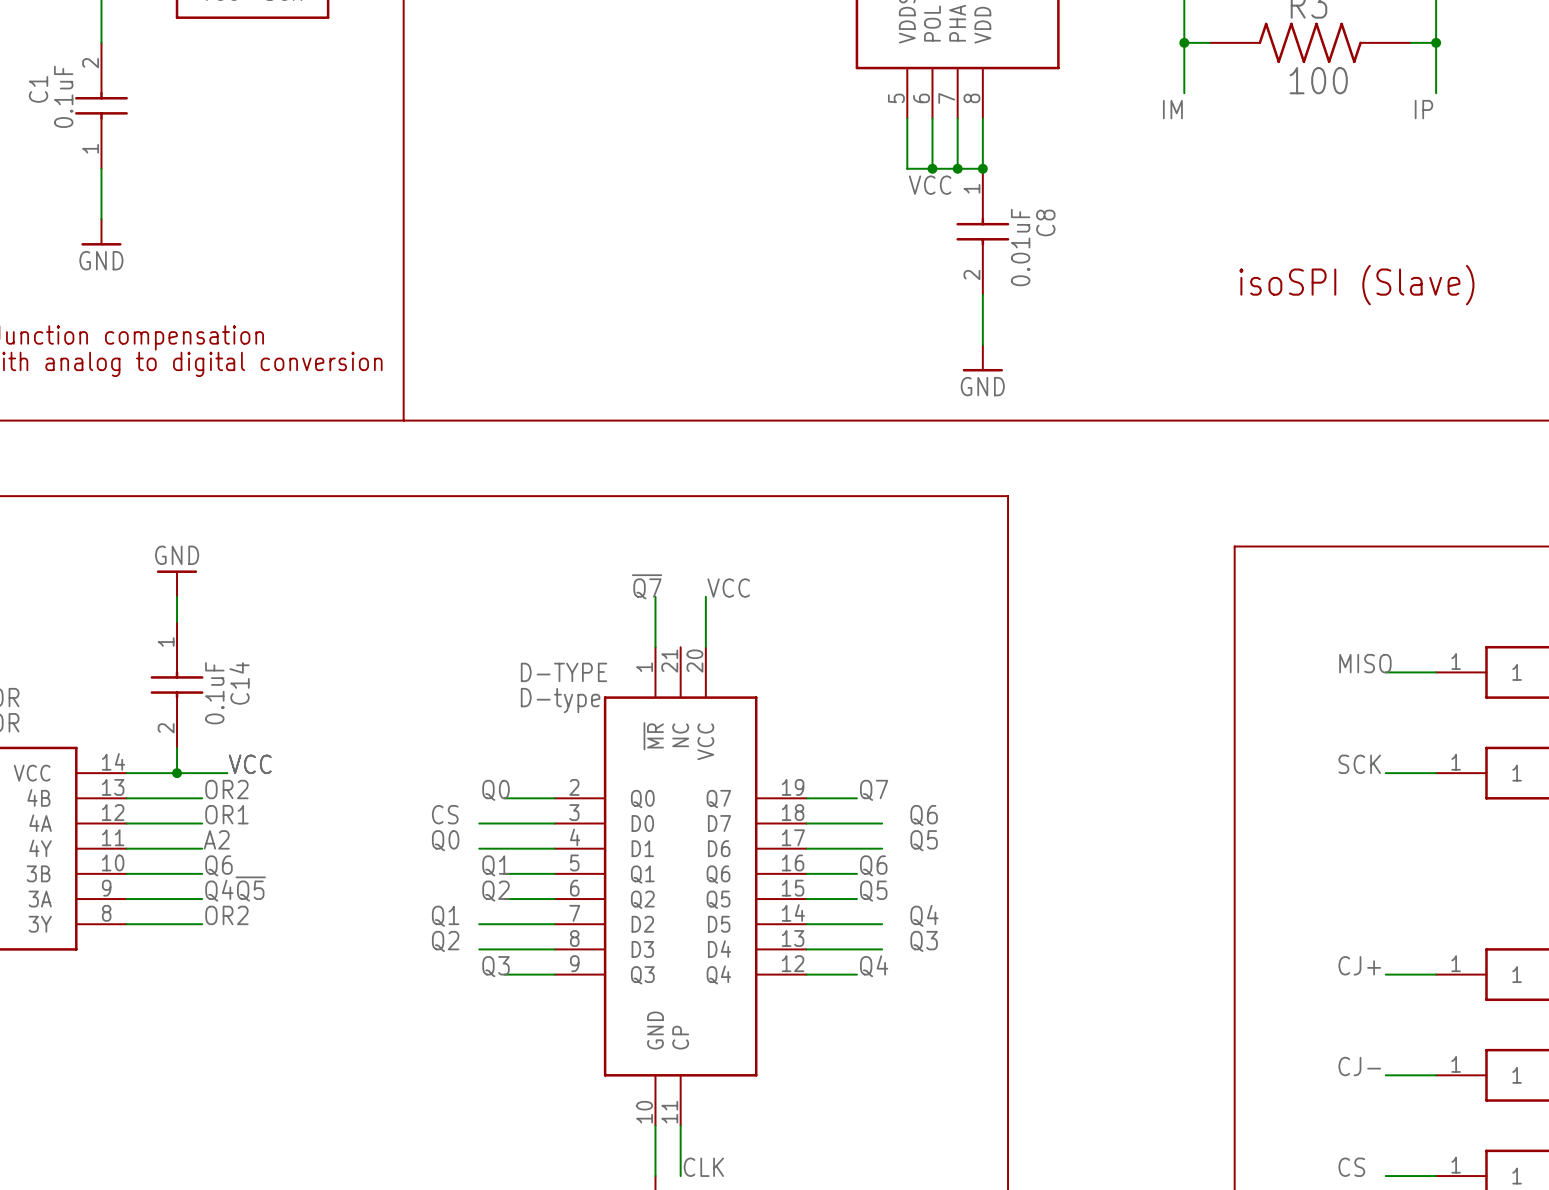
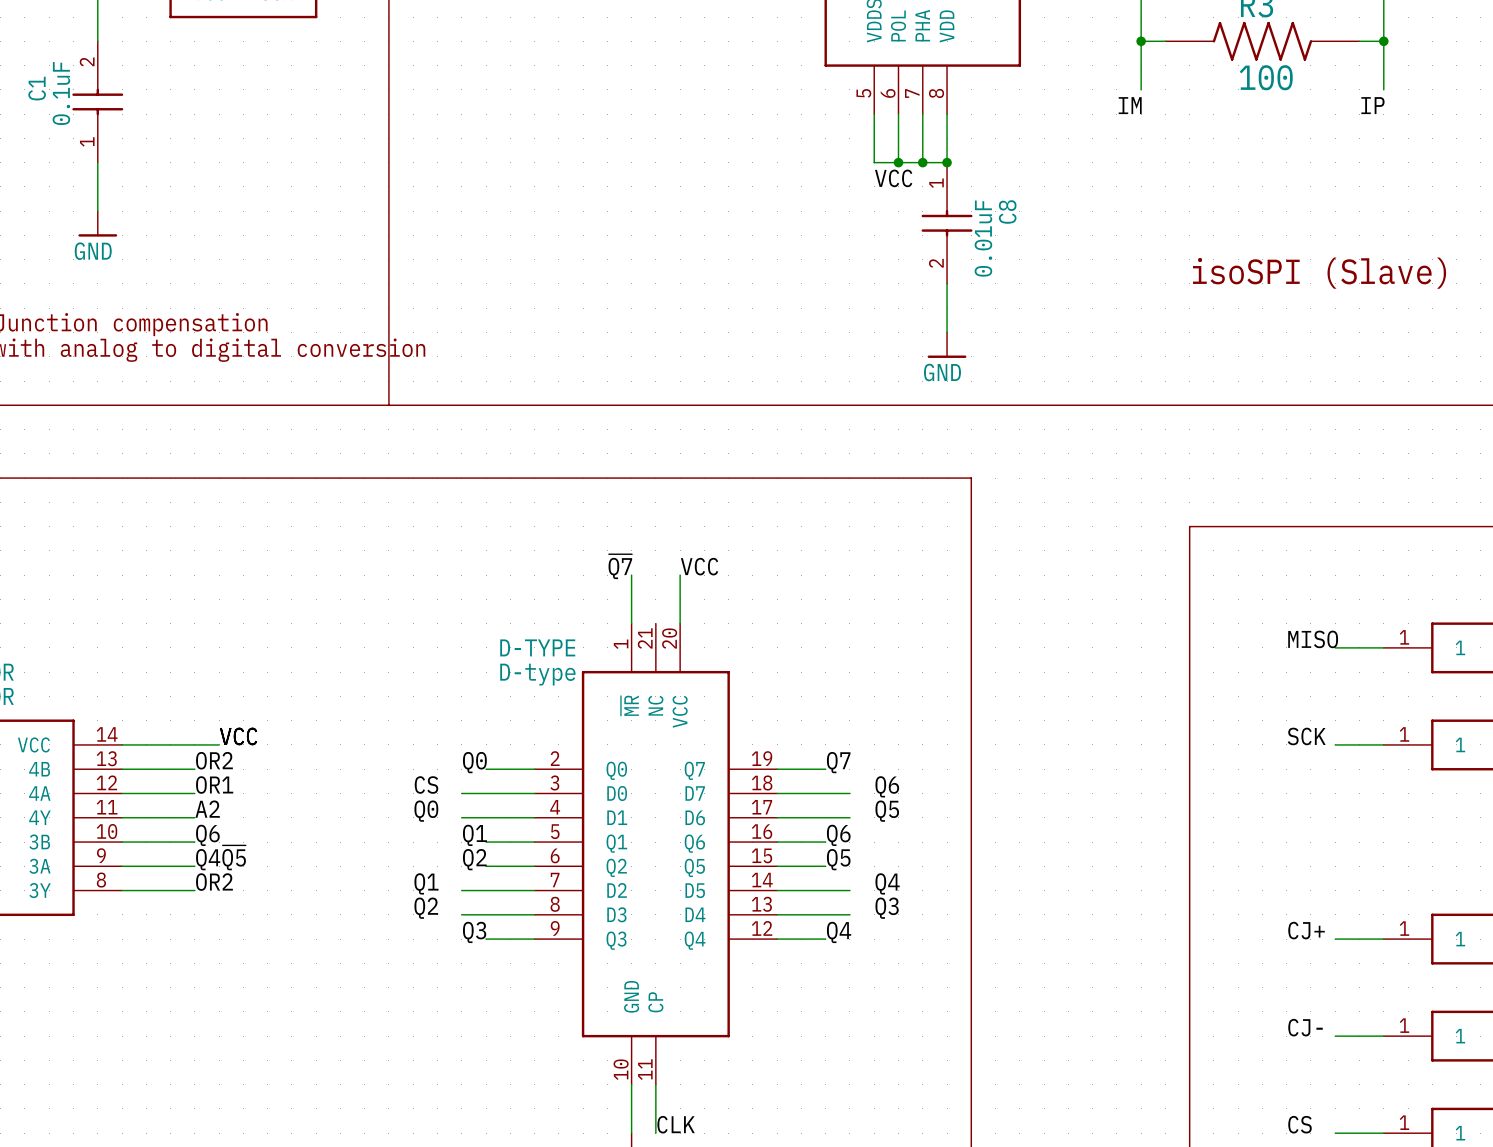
power symbol: GND (177, 583) -> none
wire: (177, 596) (177, 622) -> none
C14: 0.1uF (177, 685) -> none
wire: (177, 747) (177, 773) -> none
junction: (177, 773) -> none

